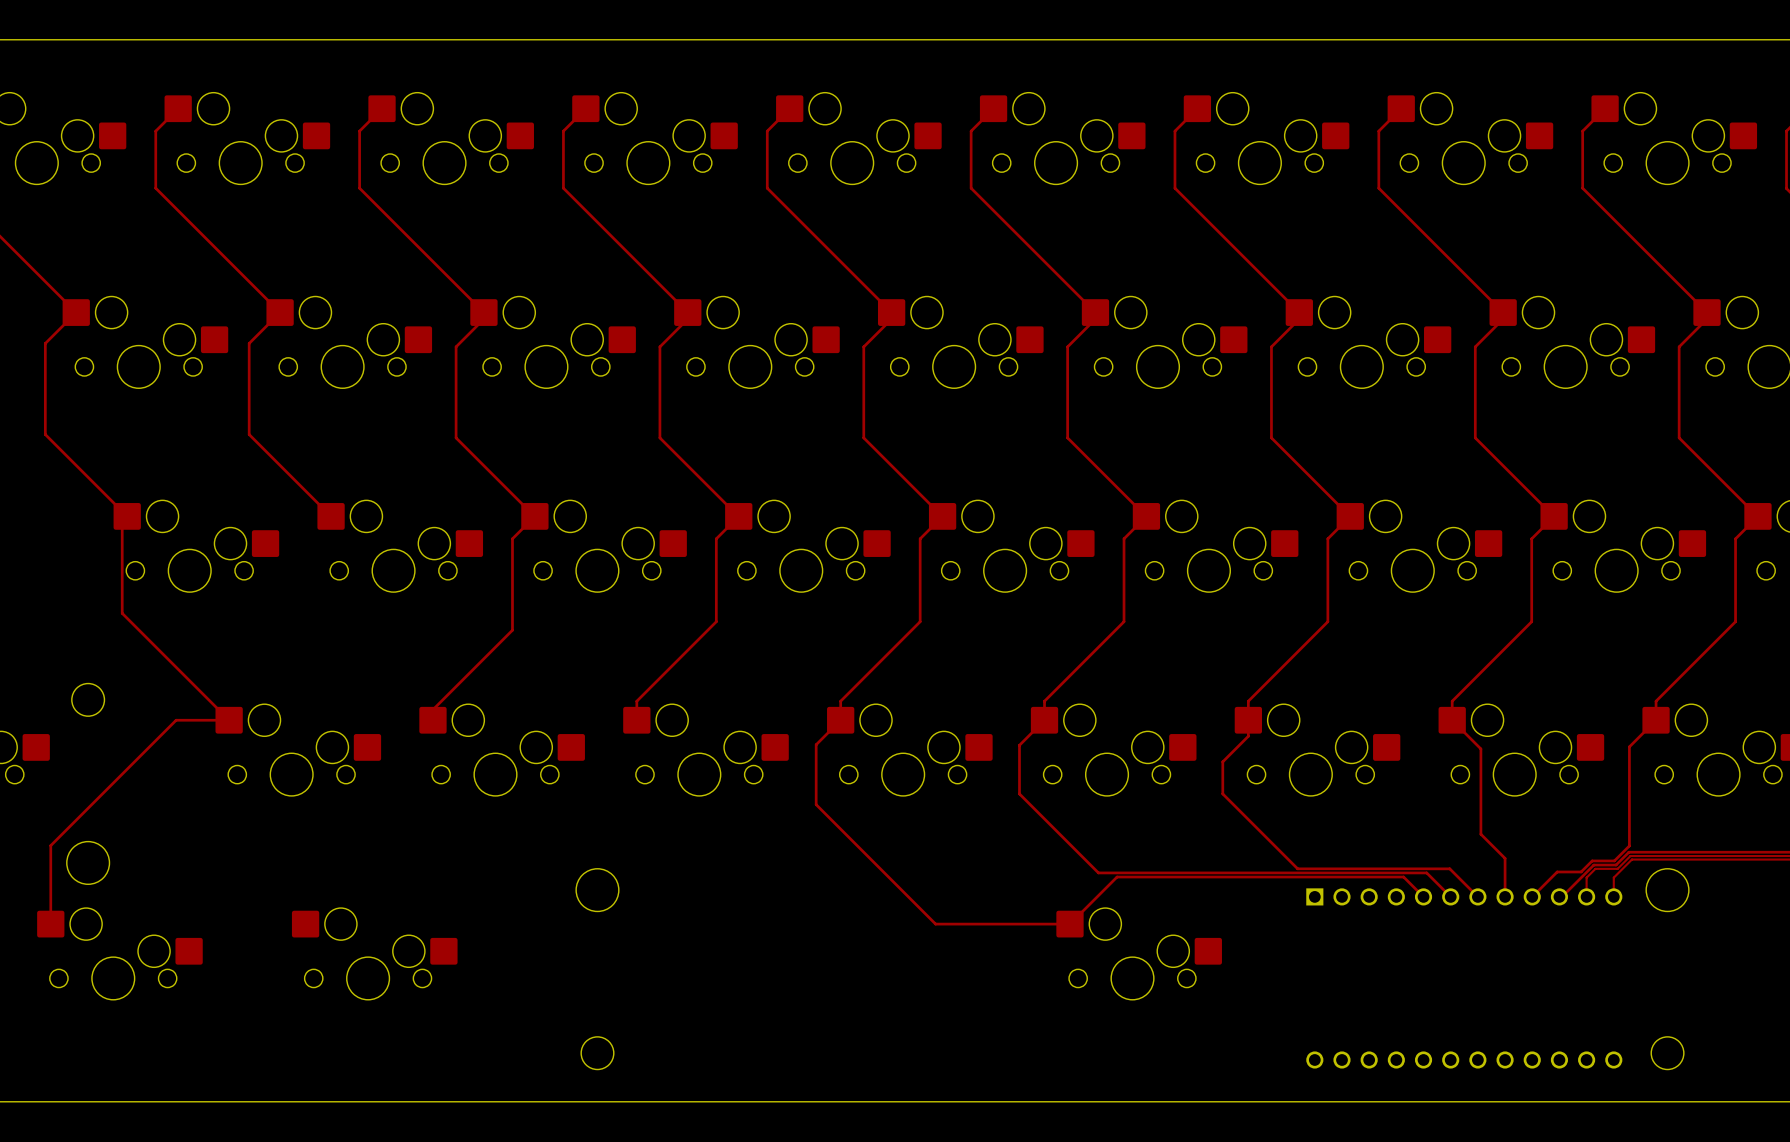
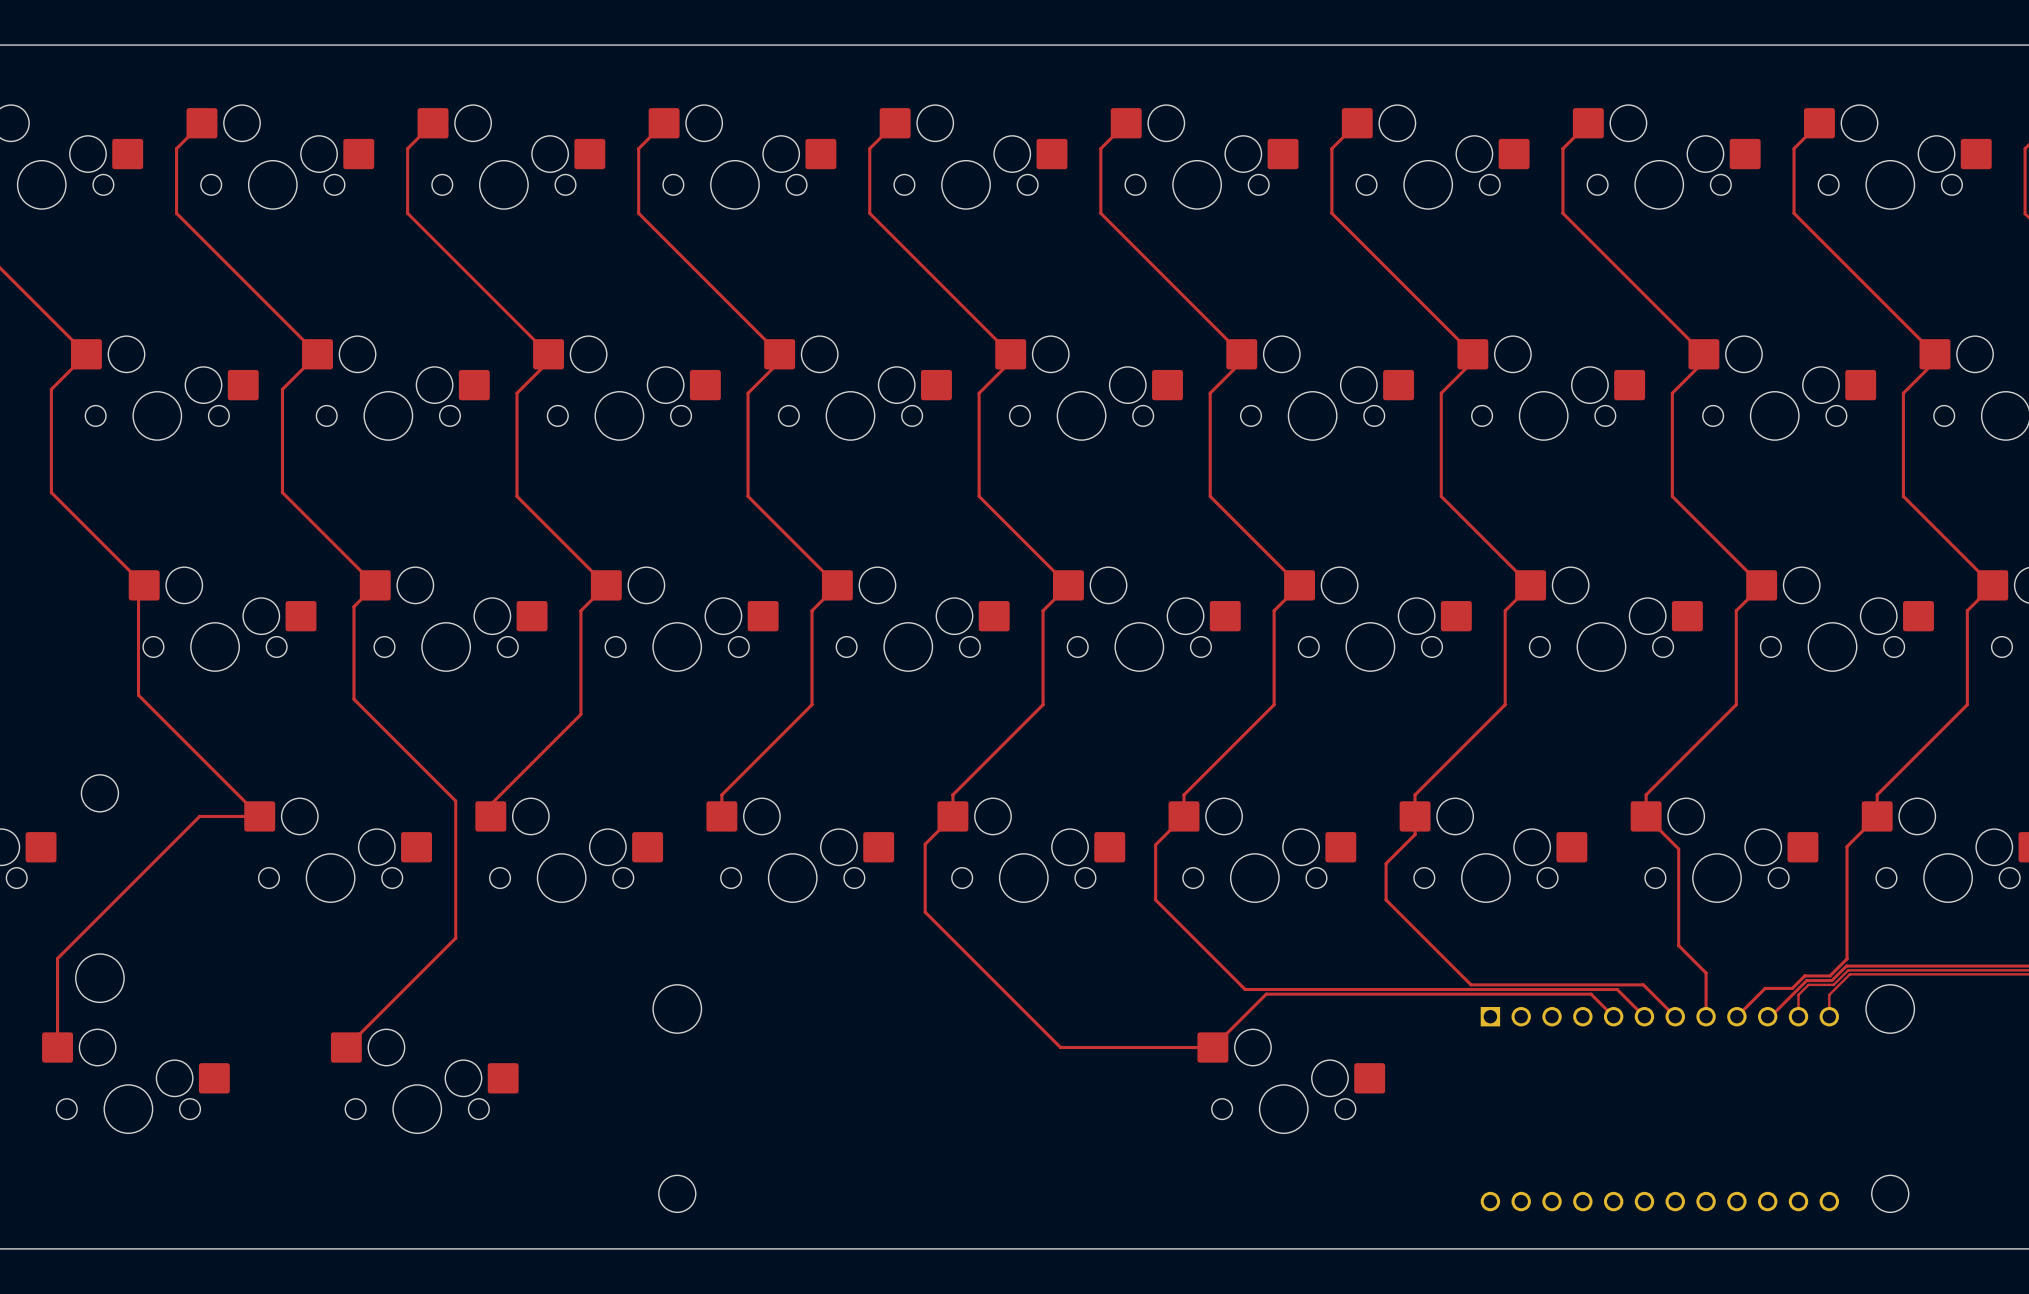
track: none -> (375, 585) (353, 606) (353, 699) (455, 801) (455, 938) (346, 1047)

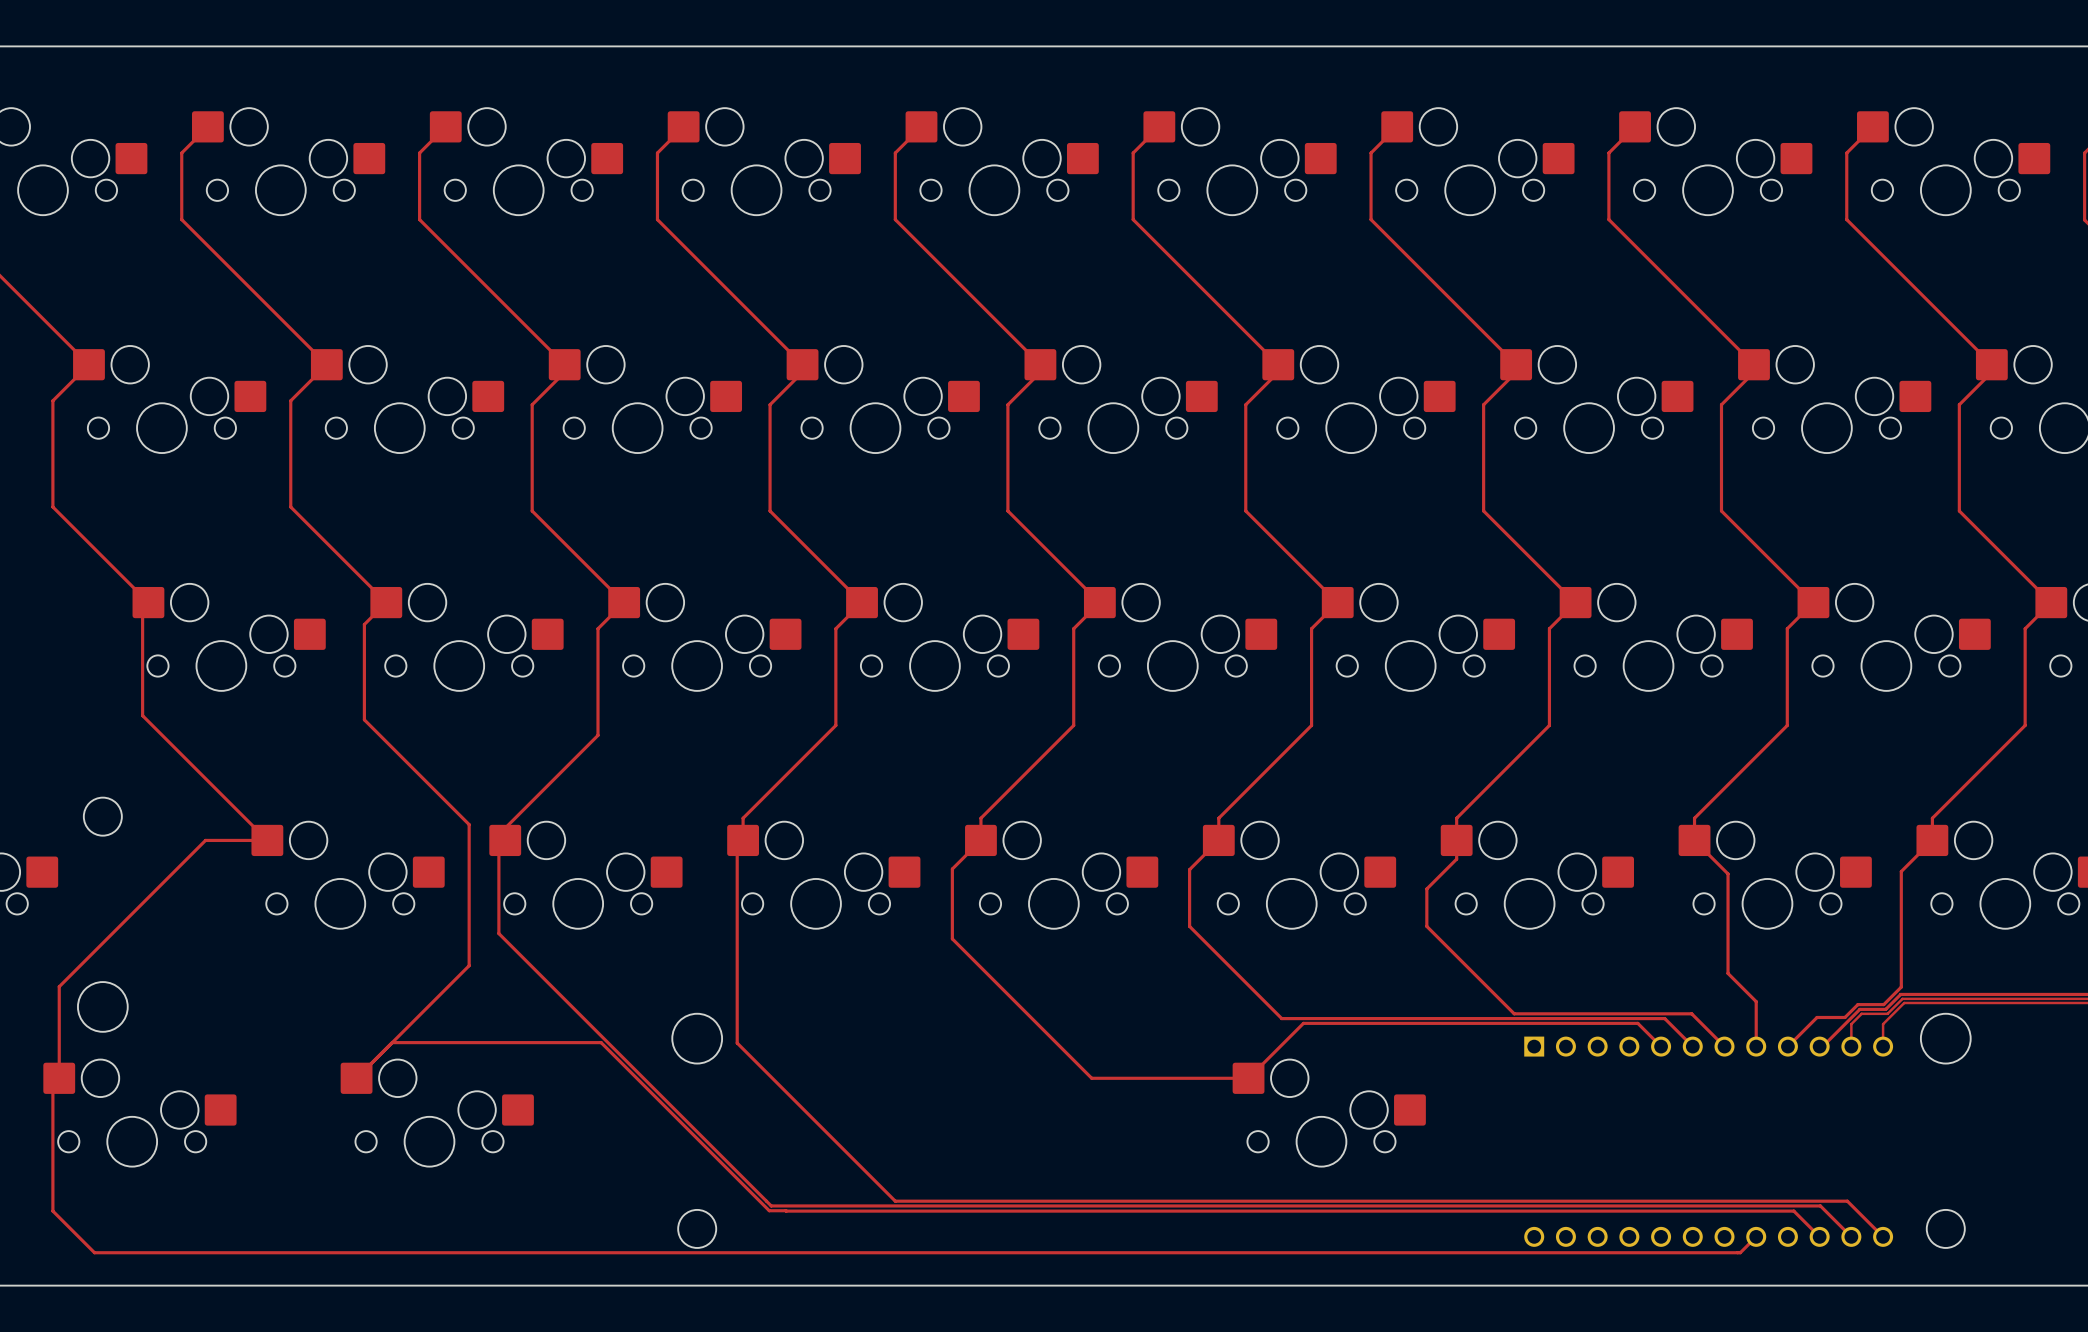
track: none -> (505, 840) (498, 846) (498, 933) (771, 1205) (1820, 1205) (1851, 1236)
track: none -> (743, 840) (737, 846) (737, 1043) (895, 1201) (1847, 1201) (1883, 1236)
track: none -> (392, 1042) (601, 1042) (769, 1210) (1793, 1211) (1819, 1236)
track: none -> (59, 1078) (52, 1084) (52, 1211) (94, 1252) (1740, 1252) (1756, 1236)

